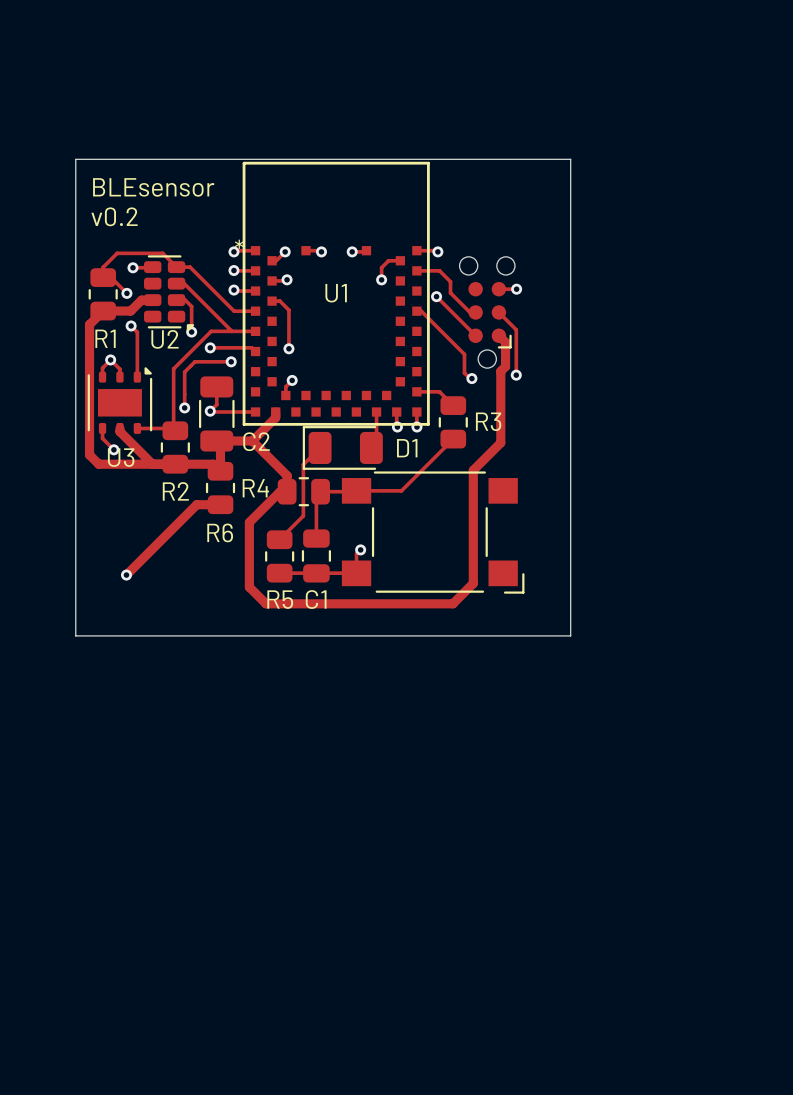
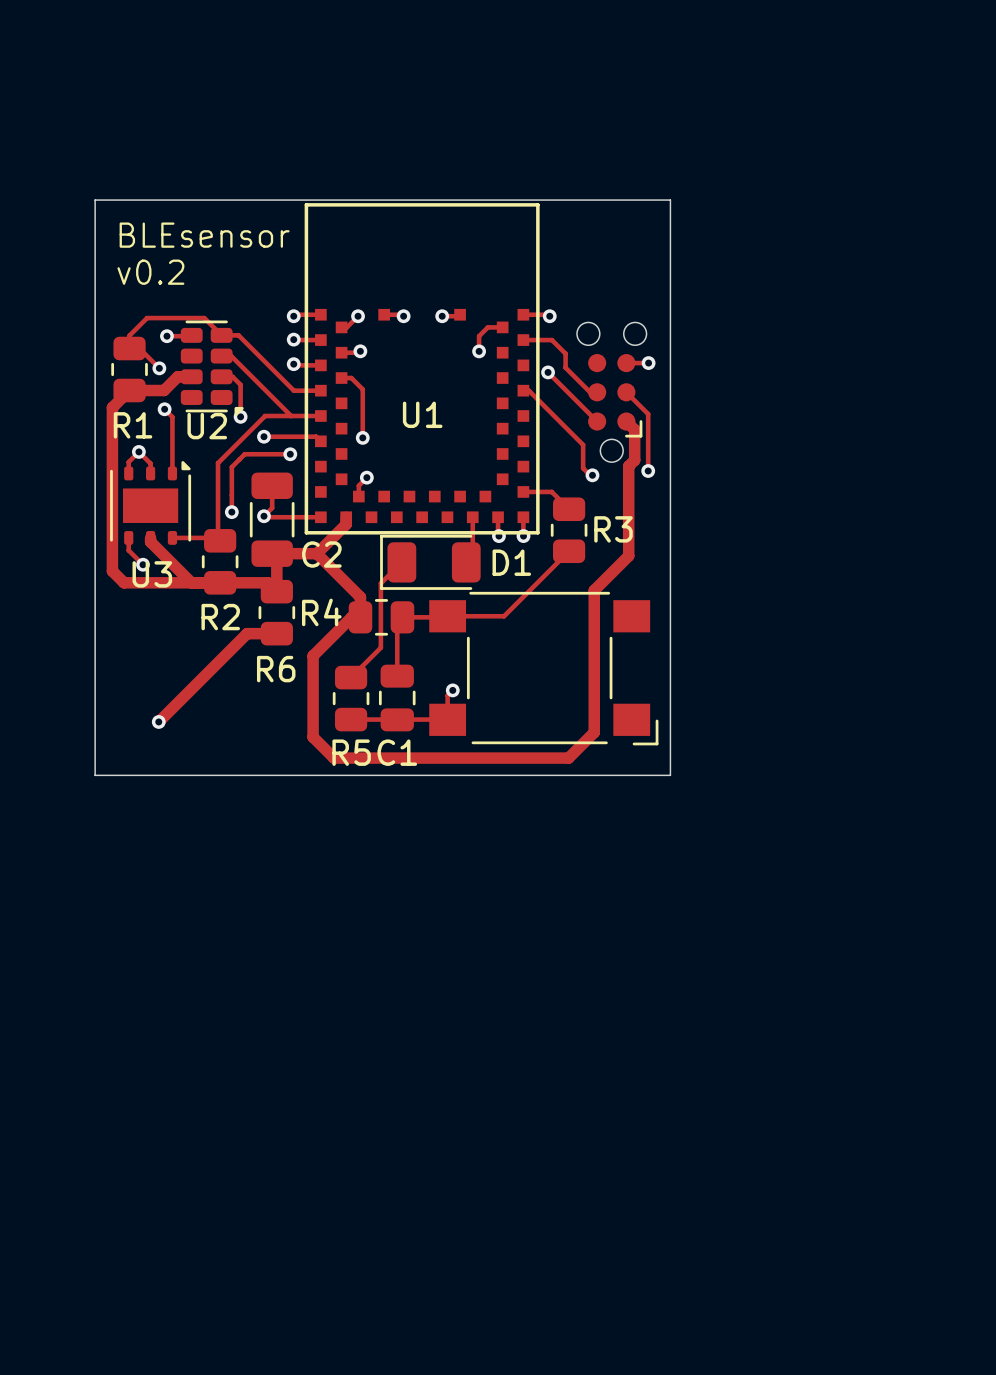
board edge: (534, 159) (570, 159) (570, 635) (75, 635) (75, 617) -> (670, 200) (670, 775) (95, 775)
U1 text: * (239, 244) -> none
U1 name position: U1 (336, 293) -> U1 (422, 414)

